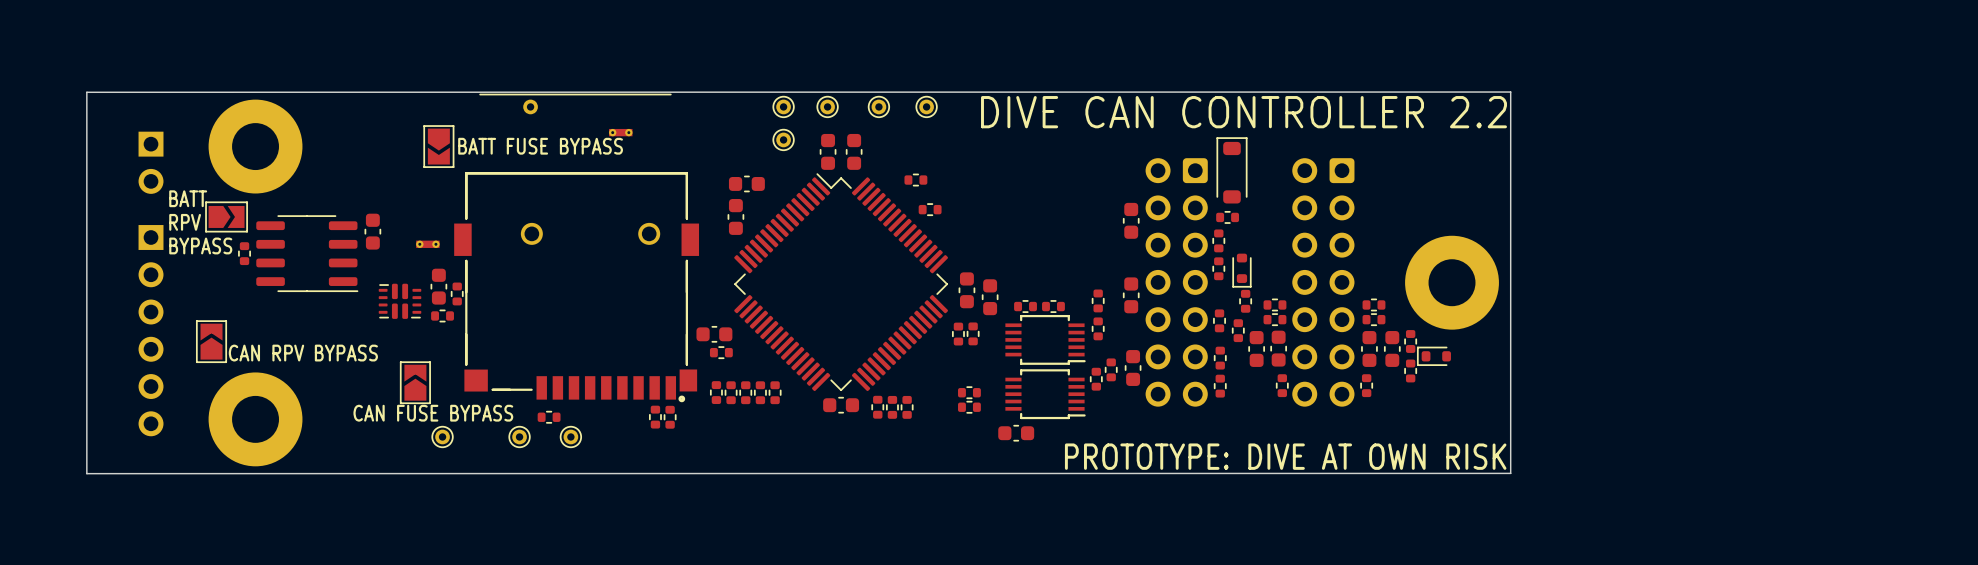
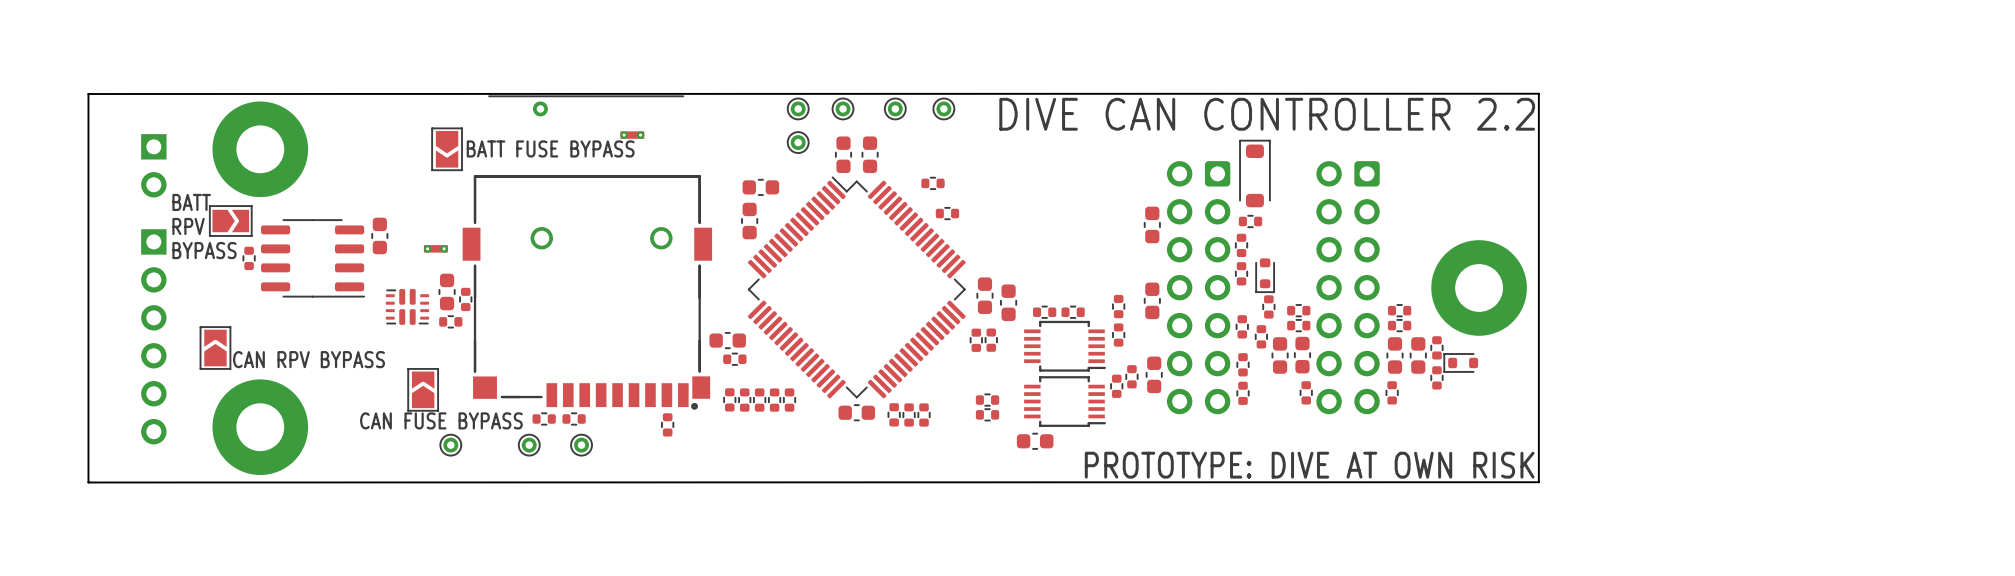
part: none -> (544, 418)
part: none -> (574, 418)
part: (549, 417) -> none
part: (670, 417) -> none

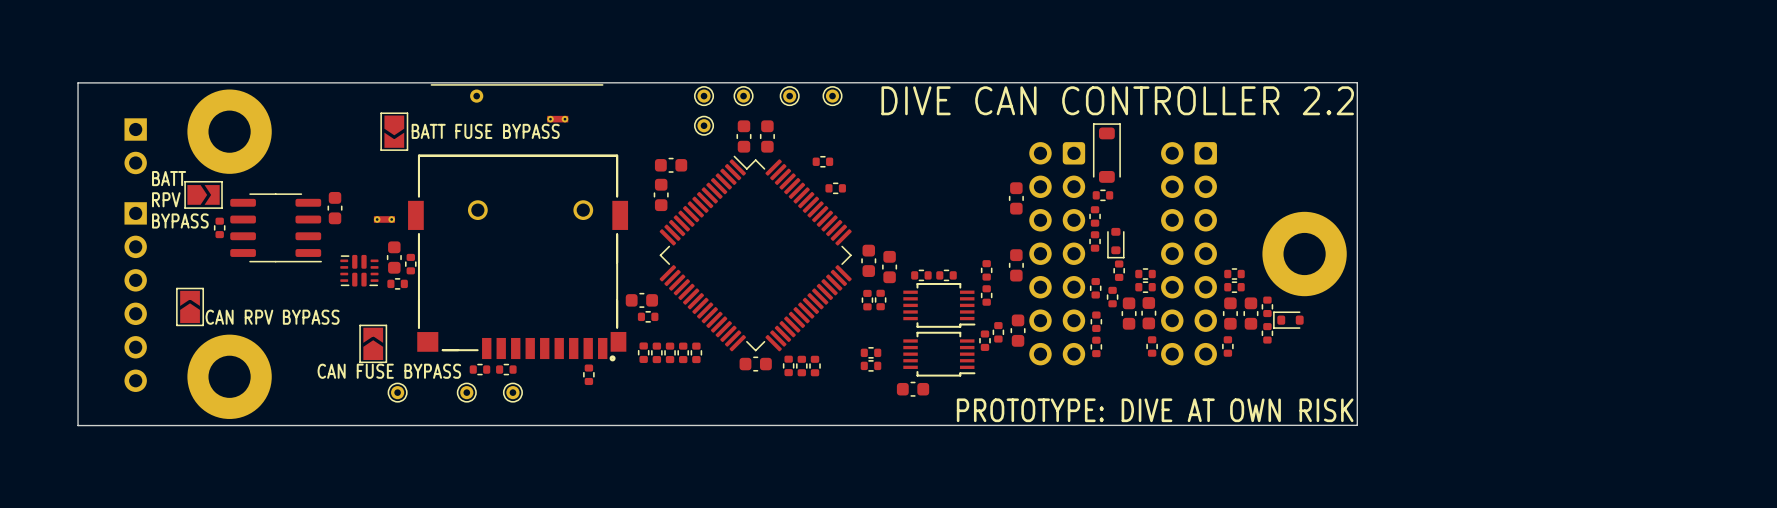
part: (976, 340) -> none
part: none -> (867, 300)
part: (991, 340) -> none
part: none -> (880, 300)

